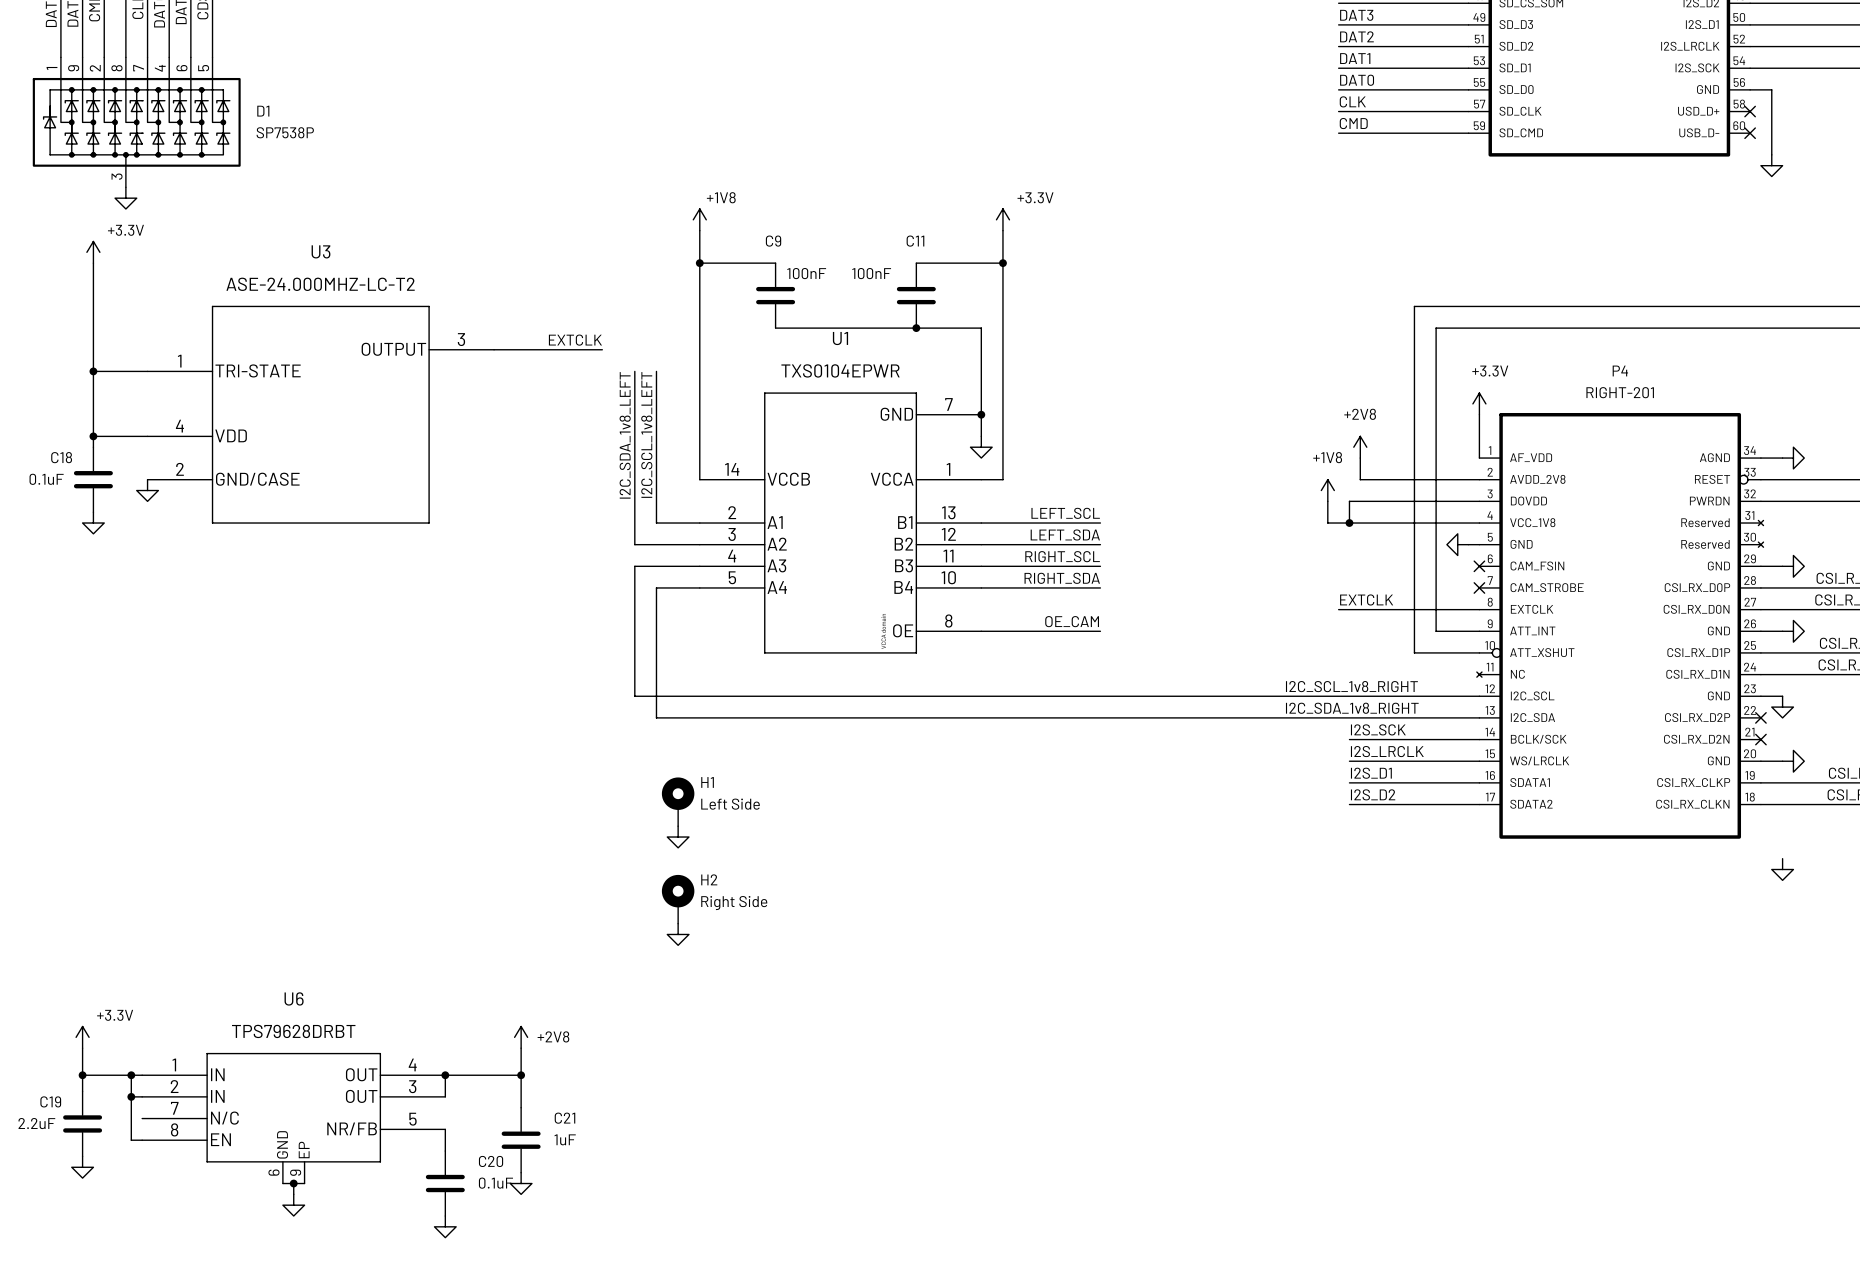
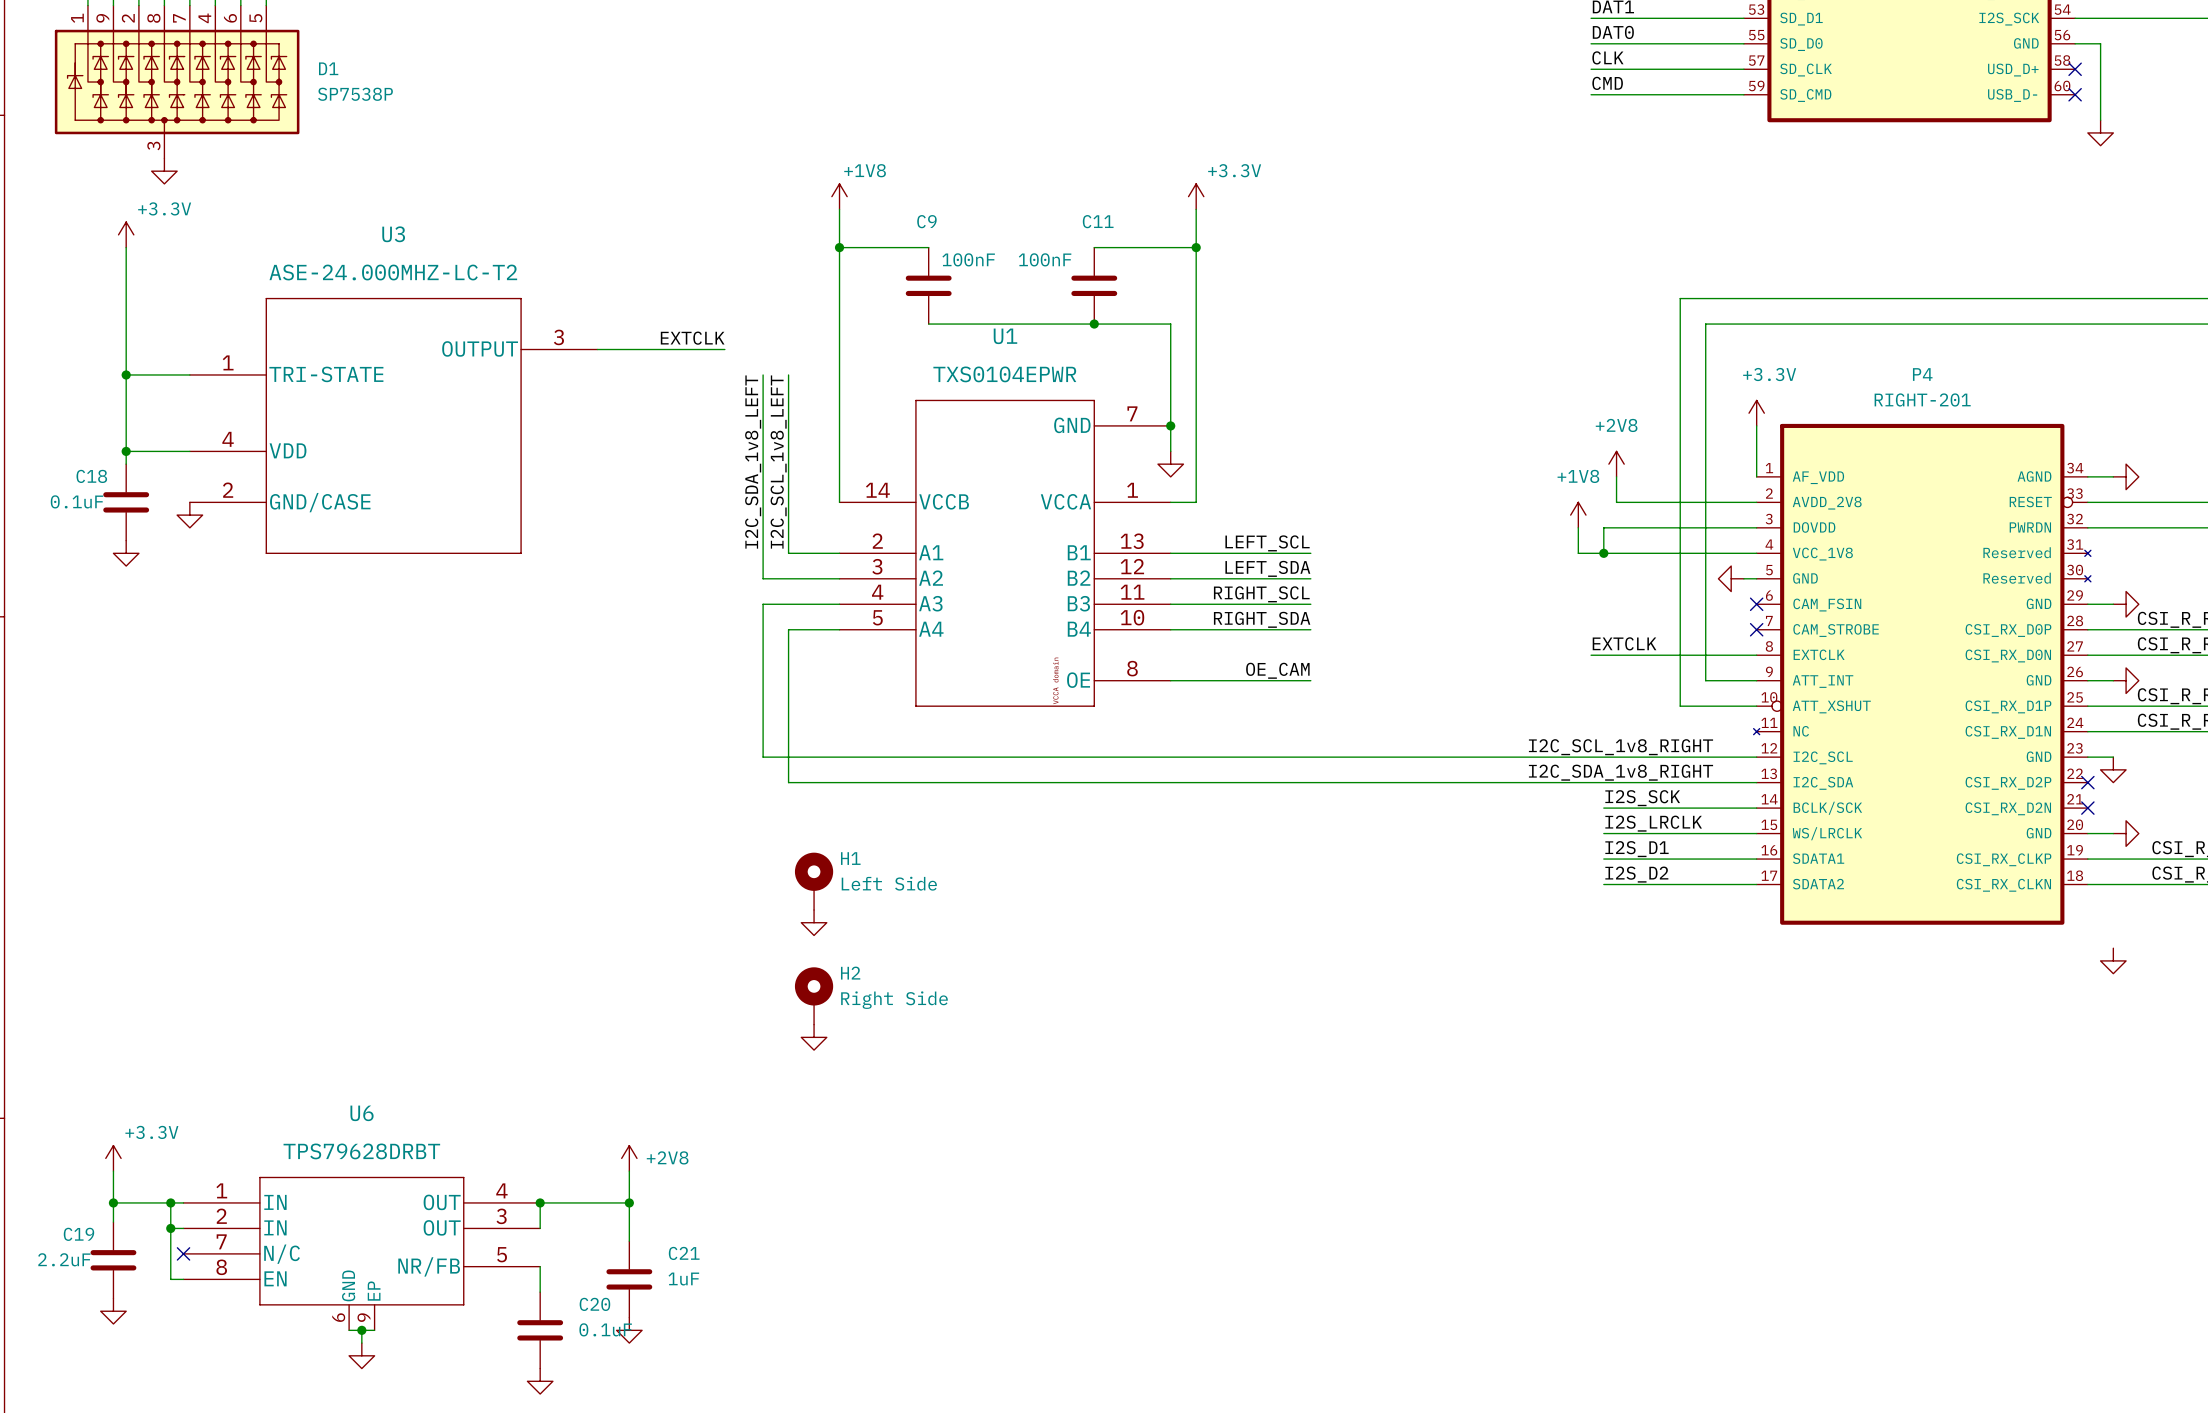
no-connect mark: none -> (183, 1253)

